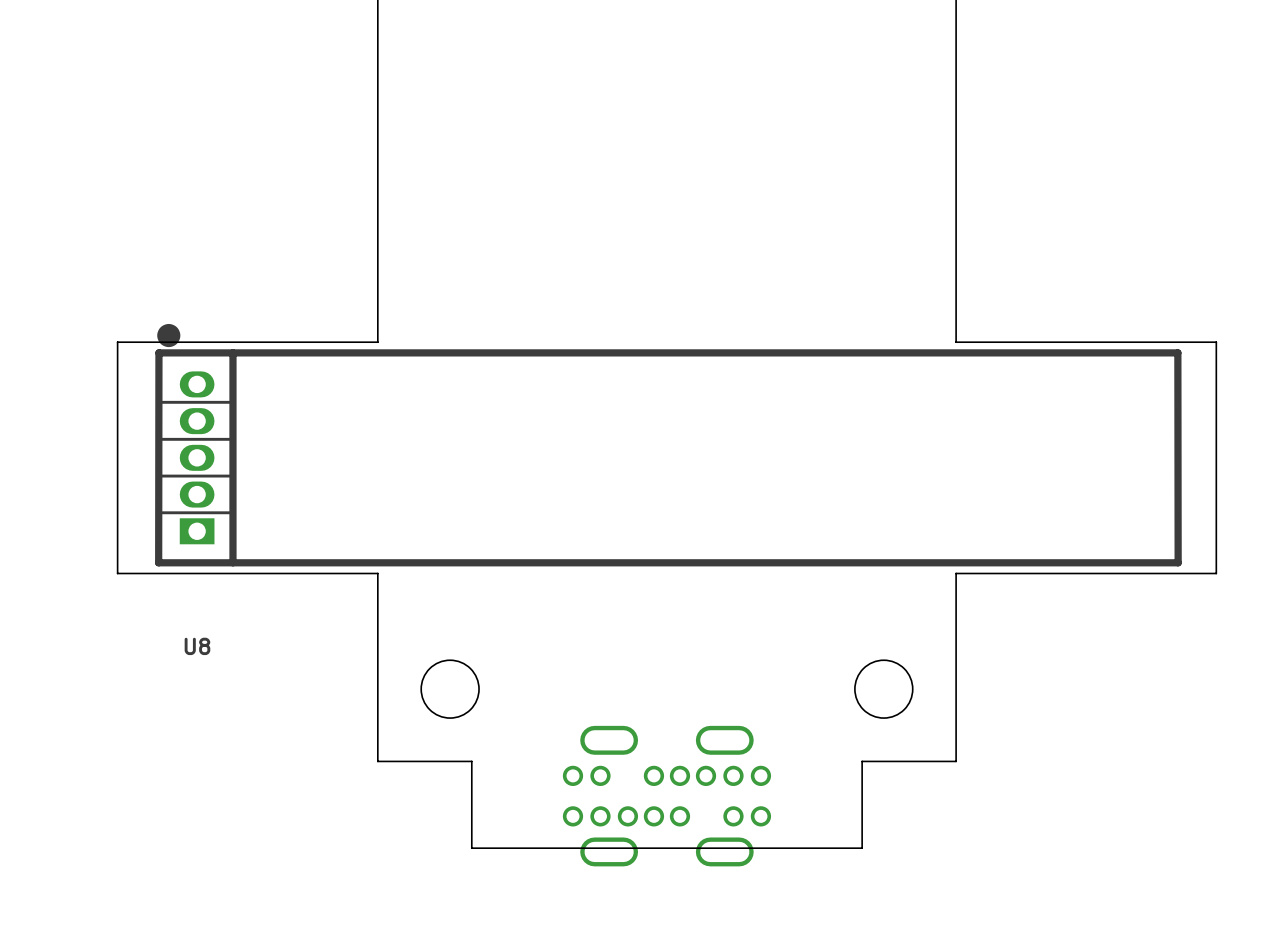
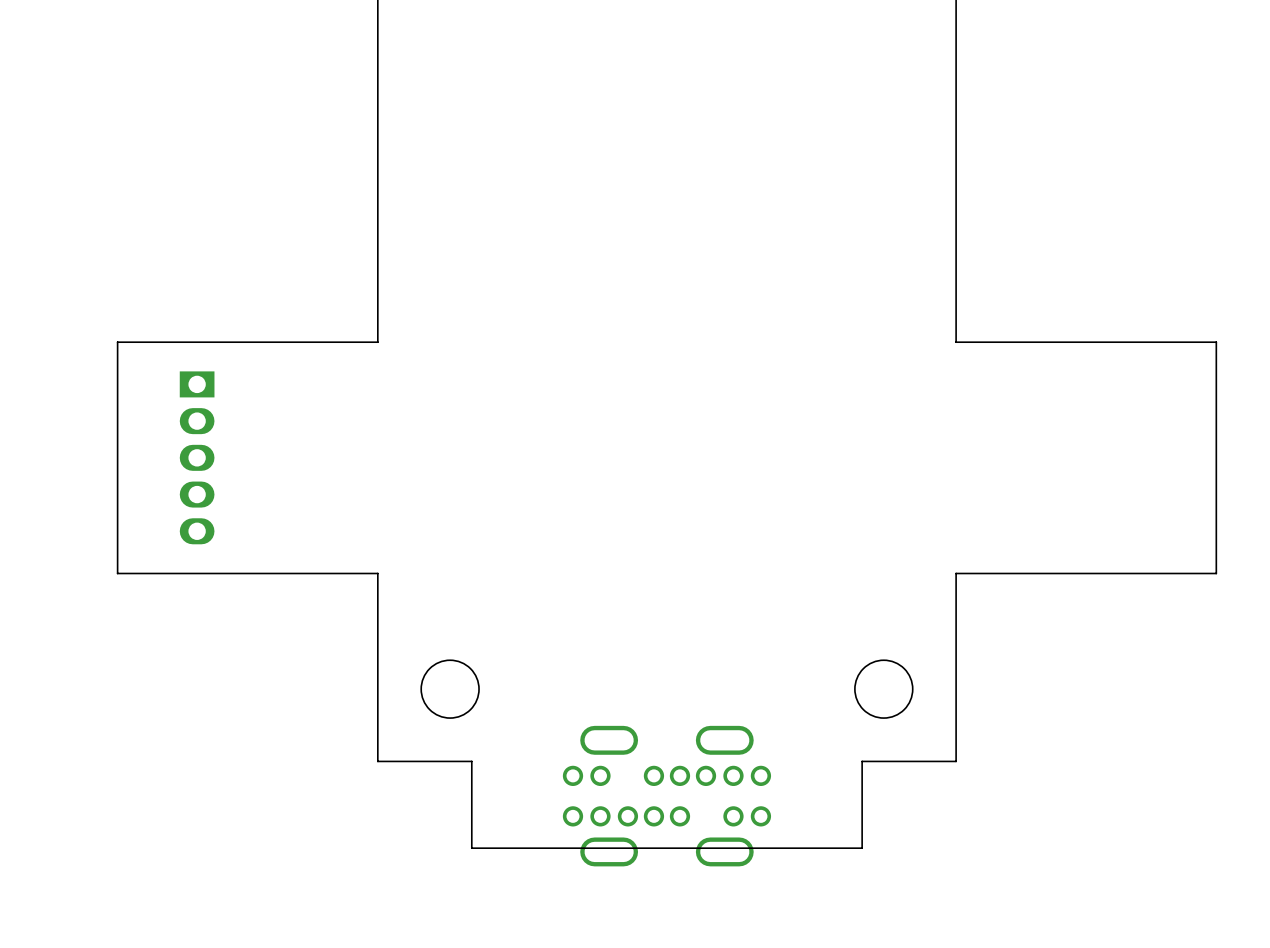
U8: (668, 445) -> none
part: none -> (197, 457)

